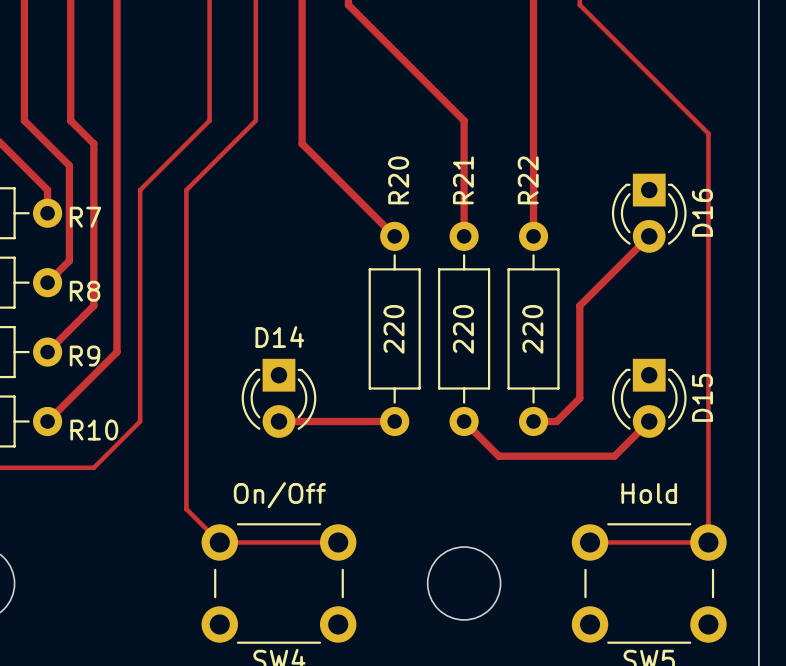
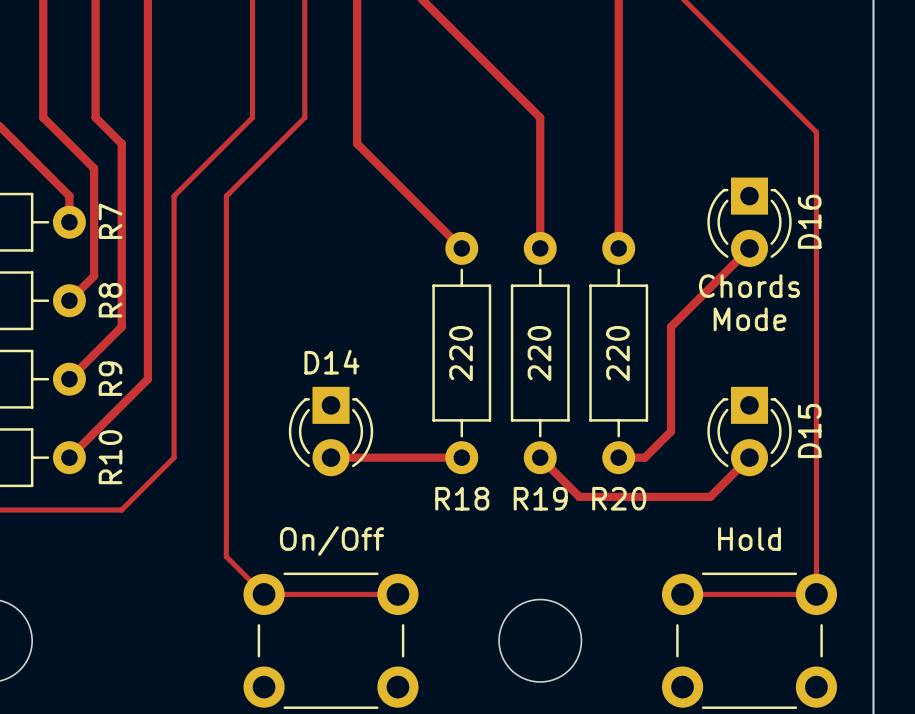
R20 name: R20 (398, 180) -> R18 (462, 498)
R21 name: R21 (463, 180) -> R19 (540, 498)
R22 name: R22 (528, 180) -> R20 (619, 498)
R7 name rotation: 0° (85, 217) -> 90° counterclockwise (110, 221)
text: none -> Chords (749, 286)
R8 name rotation: 0° (85, 291) -> 90° counterclockwise (110, 300)
text: none -> Mode (750, 319)
R9 name rotation: 0° (85, 356) -> 90° counterclockwise (110, 378)
R10 name rotation: 0° (94, 430) -> 90° counterclockwise (110, 457)

